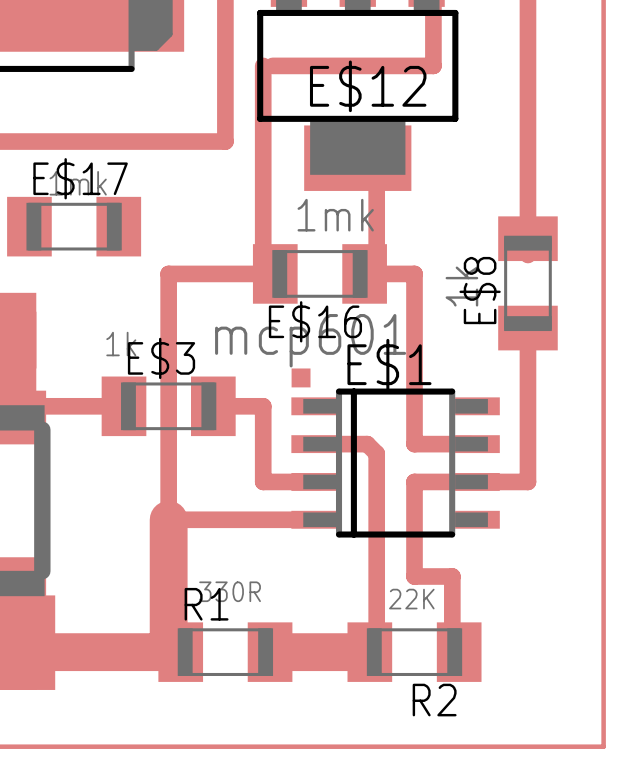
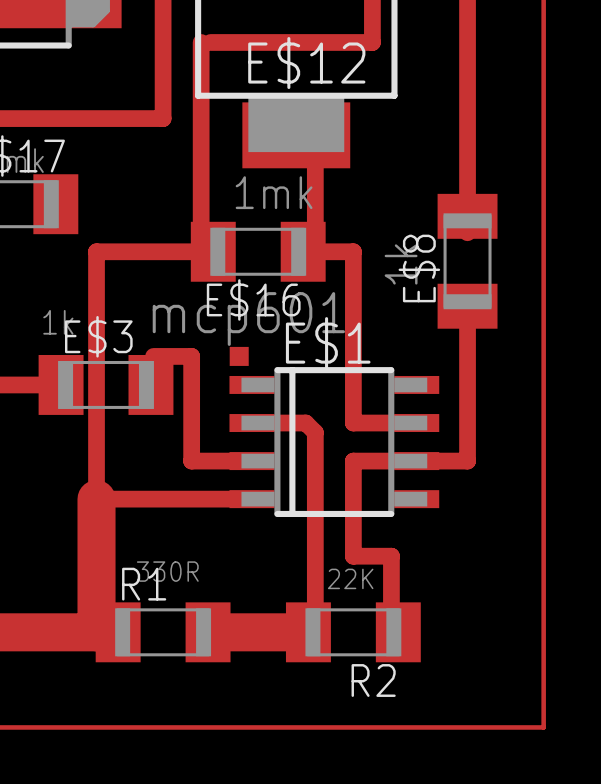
top track: (168, 273) (168, 652) (159, 652) -> (106, 251) (96, 251) (96, 499)
top track: (225, 406) (263, 406) (263, 481) -> (153, 356) (191, 356) (191, 461) (201, 461)
top track: none -> (96, 499) (96, 632)

